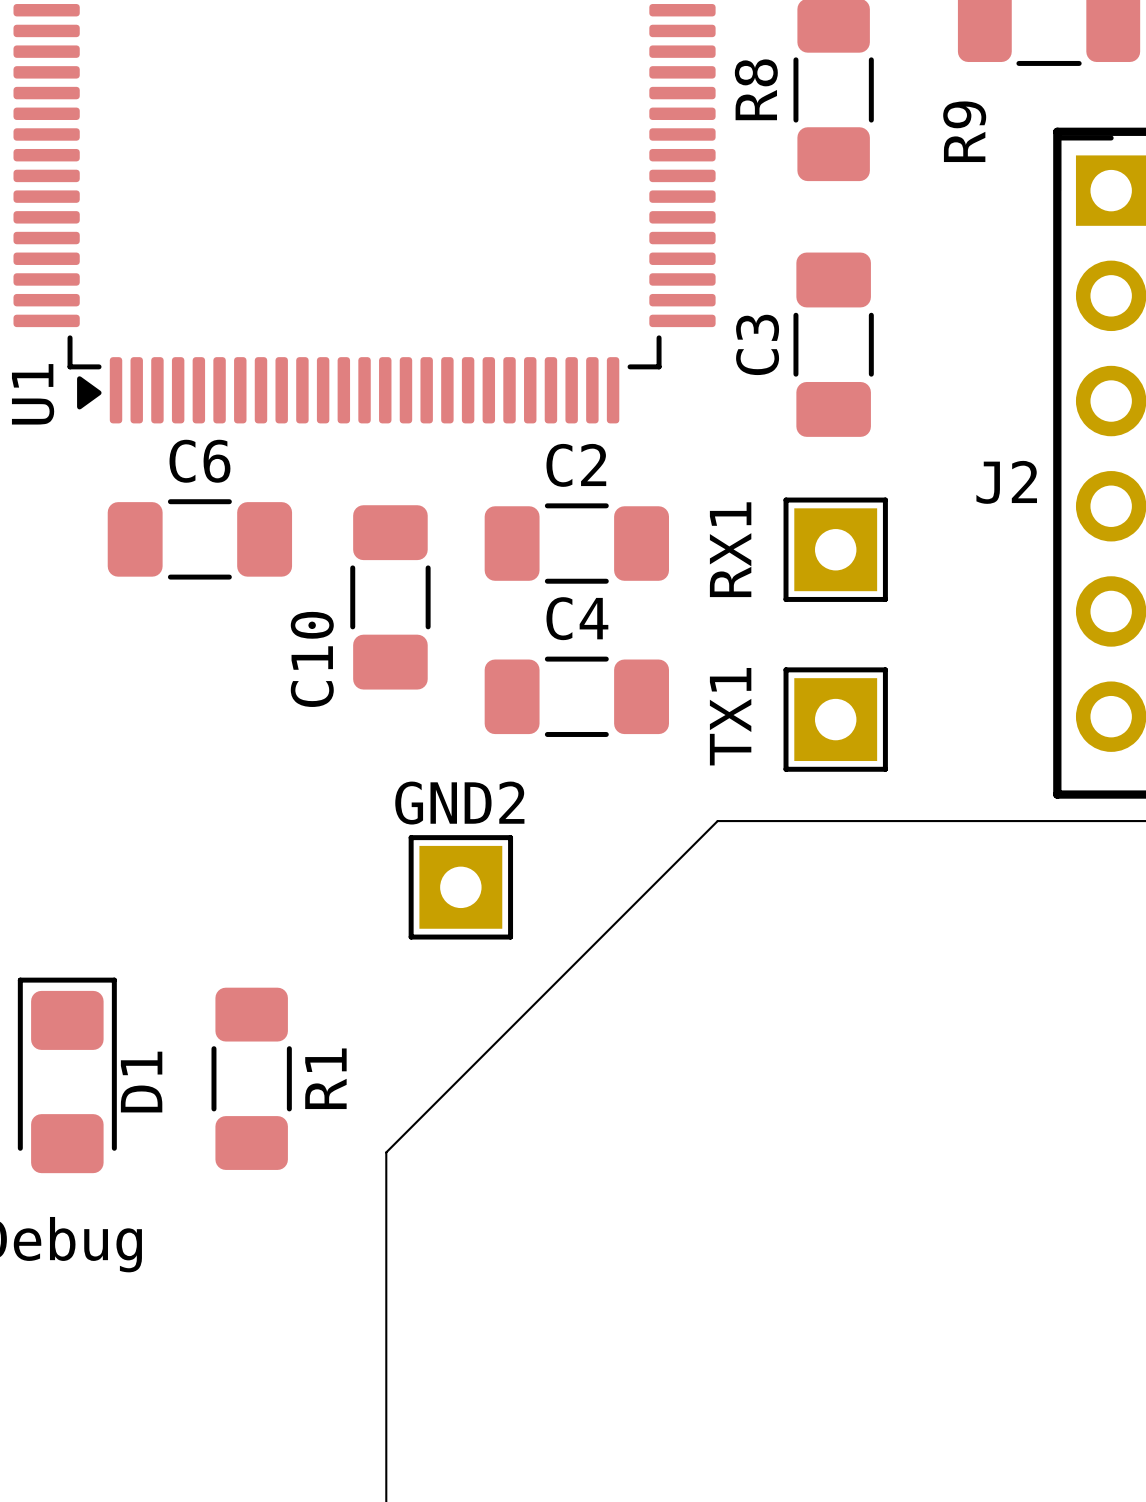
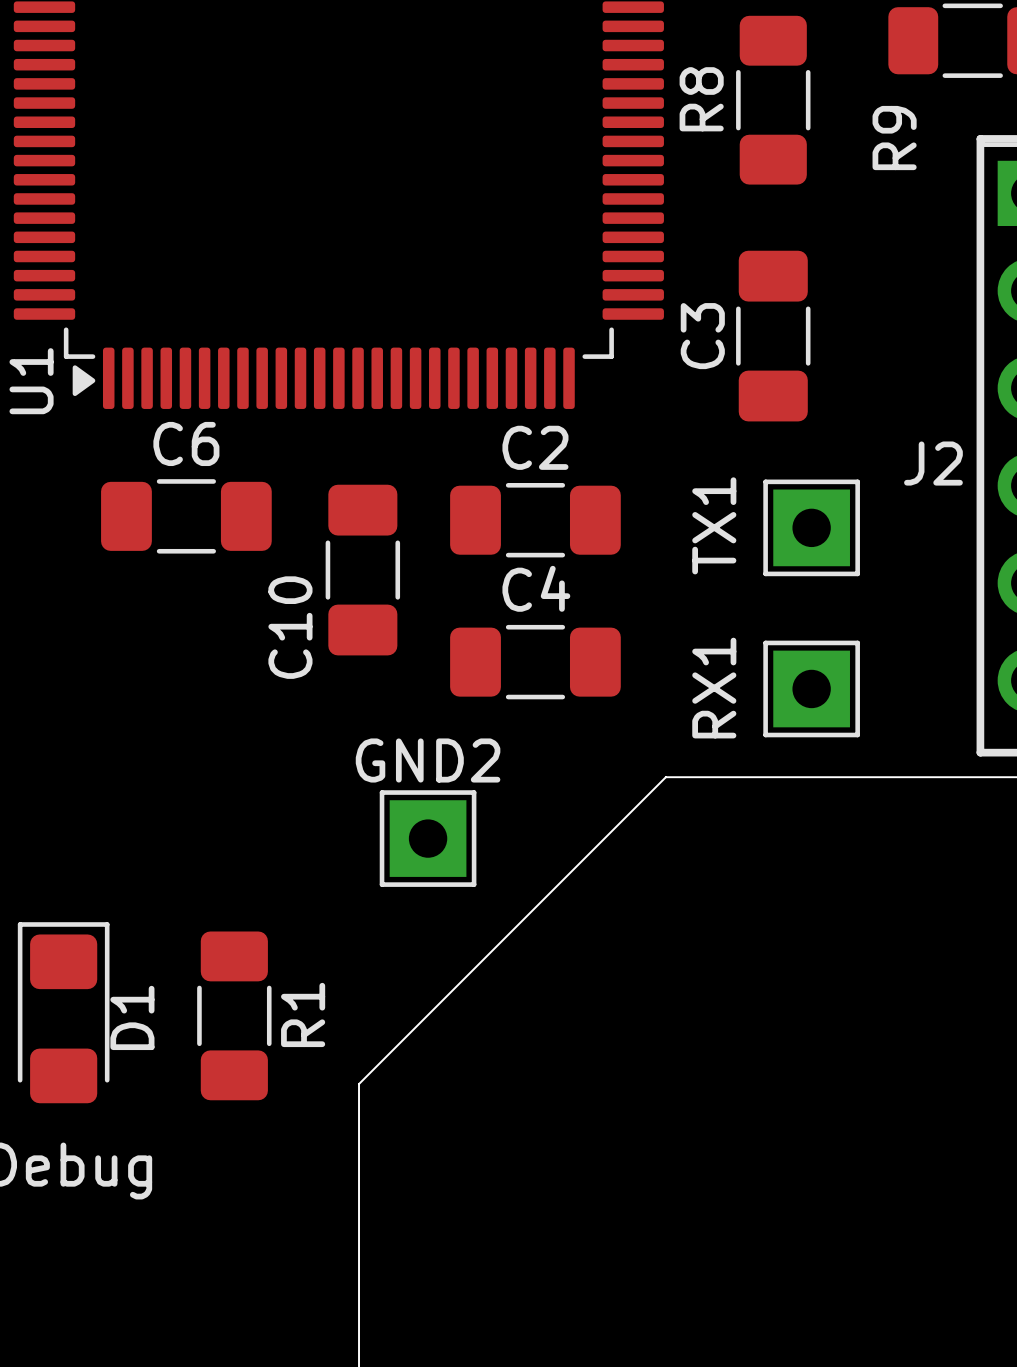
RX1 position: (835, 549) -> (811, 688)
TX1 position: (835, 719) -> (811, 527)

